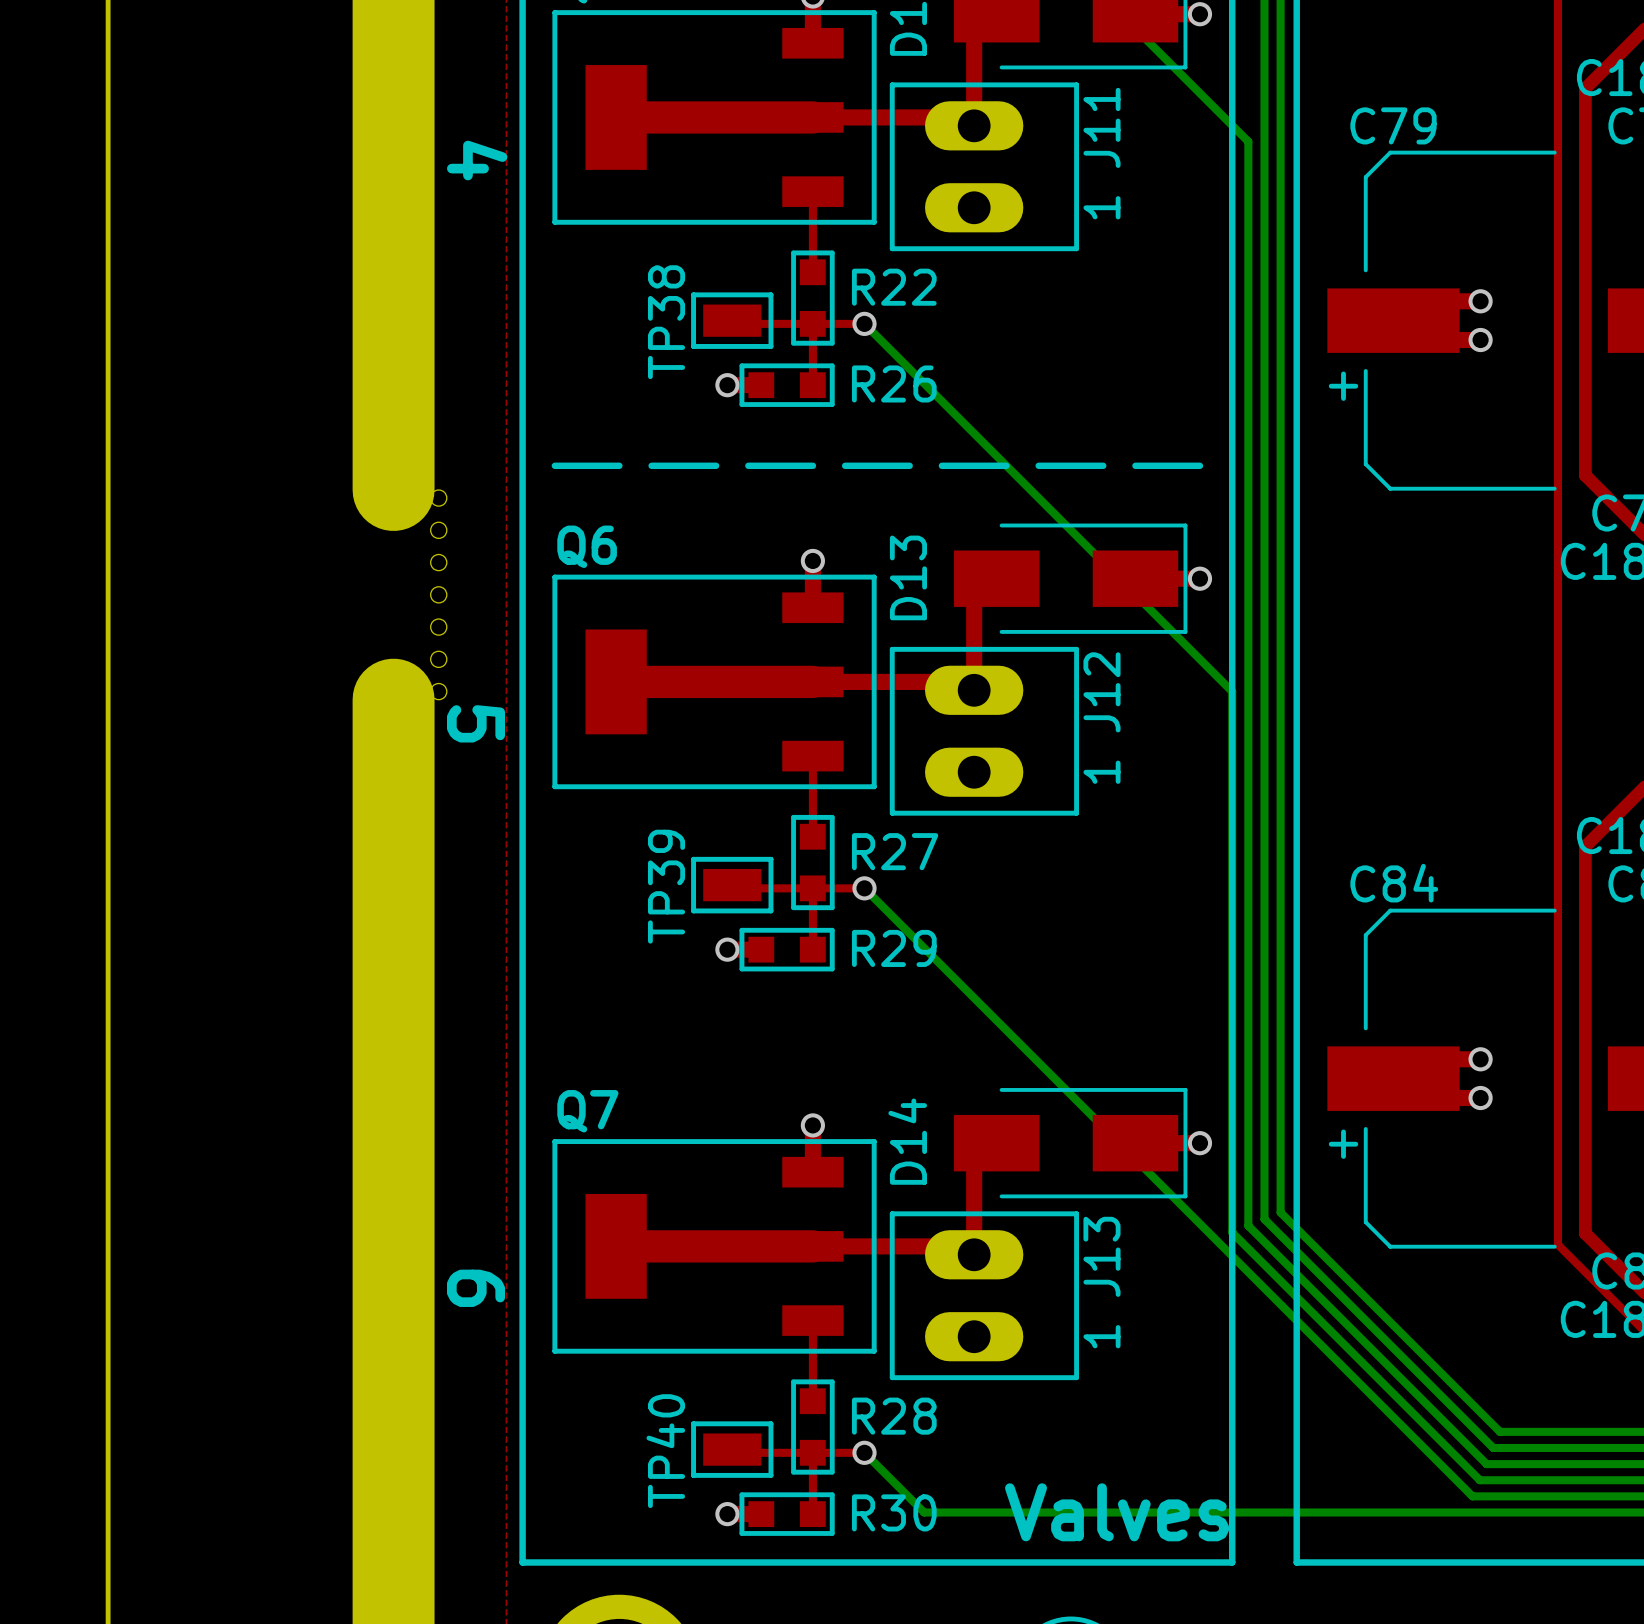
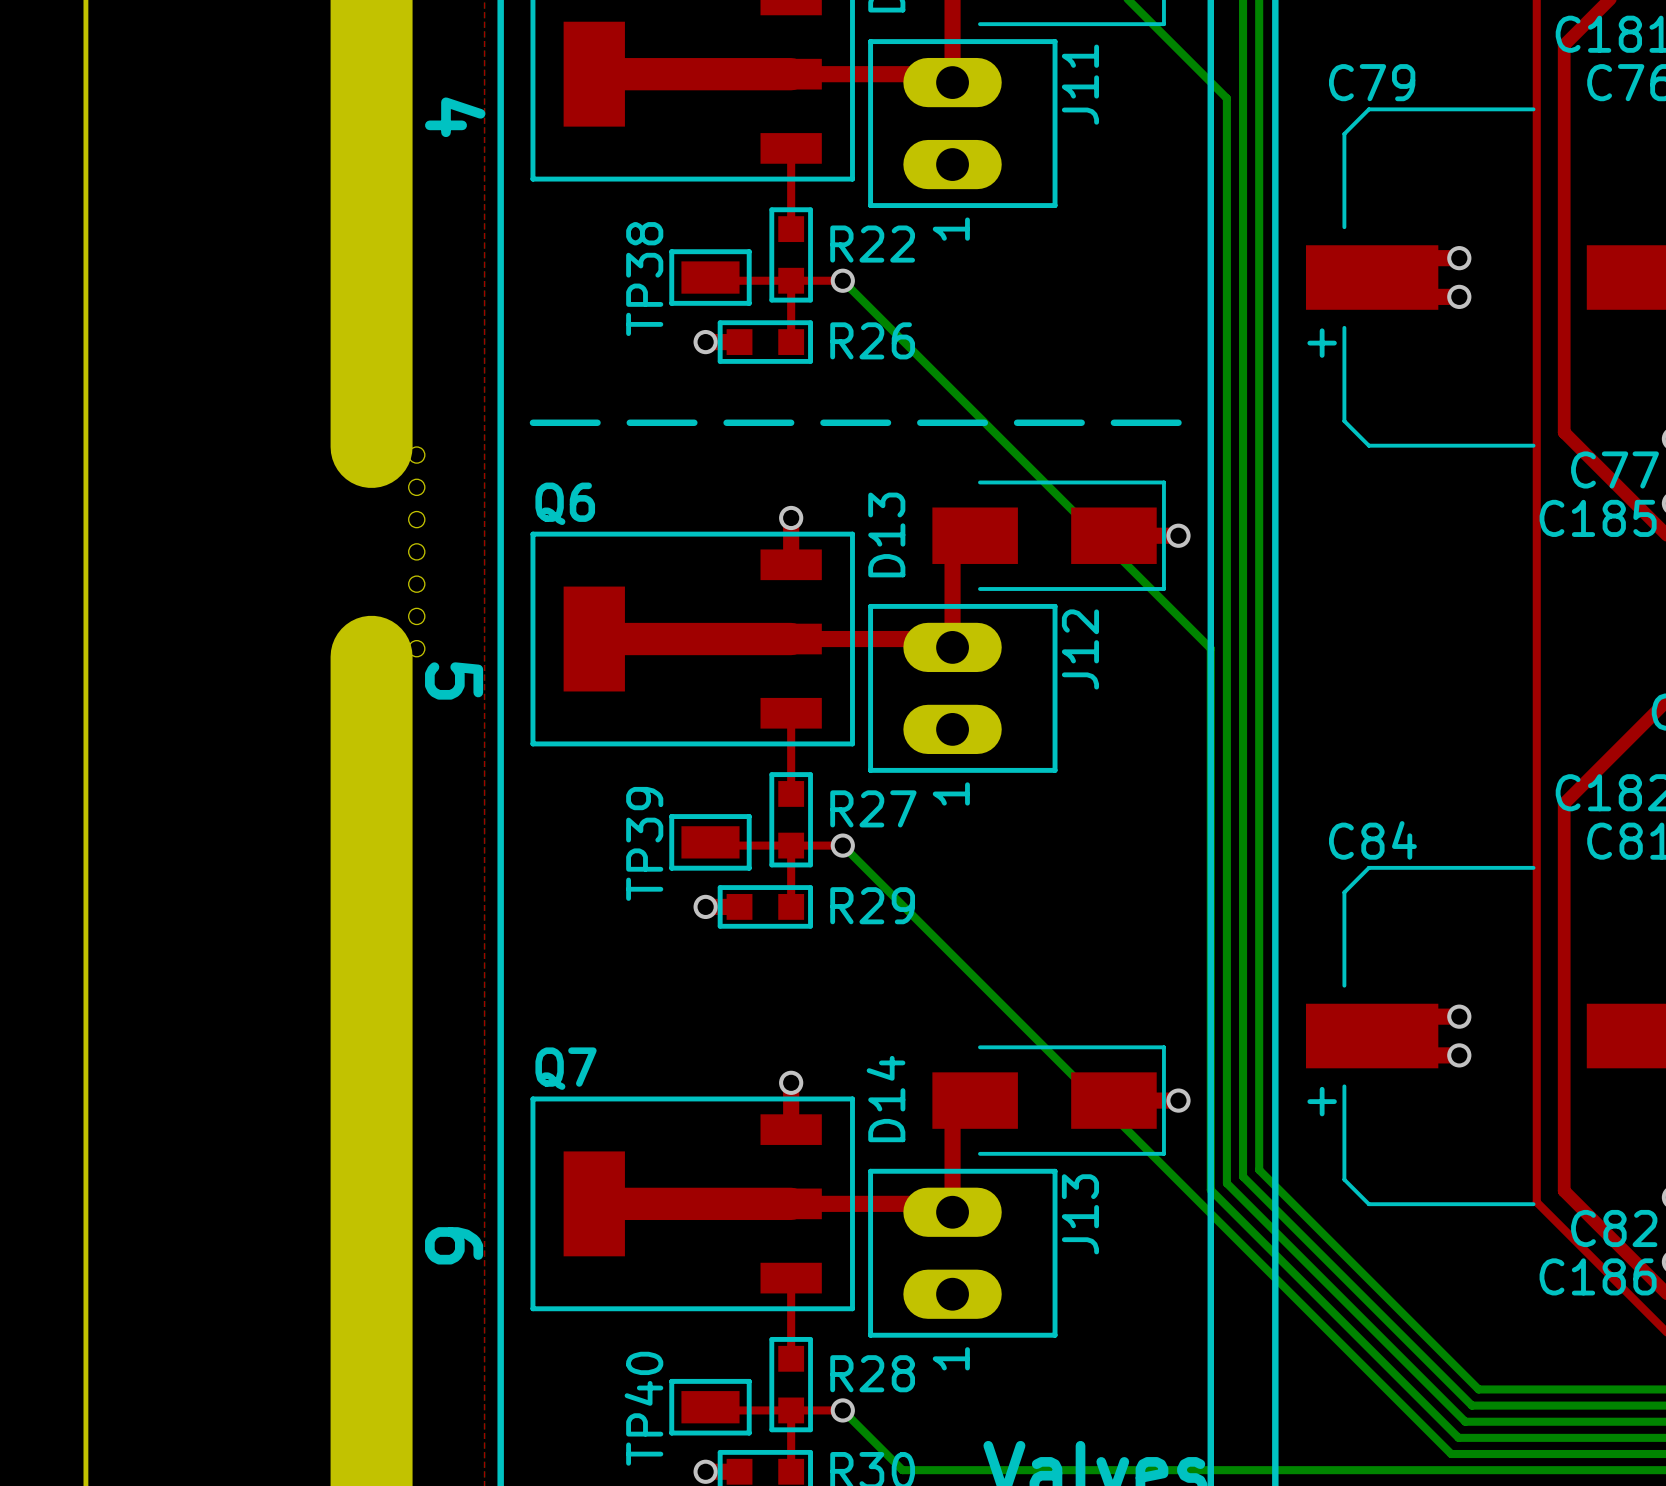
J11 text position: 1 (1101, 207) -> 1 (951, 229)
J12 text position: 1 (1101, 772) -> 1 (951, 793)
J13 text position: 1 (1101, 1336) -> 1 (951, 1358)

